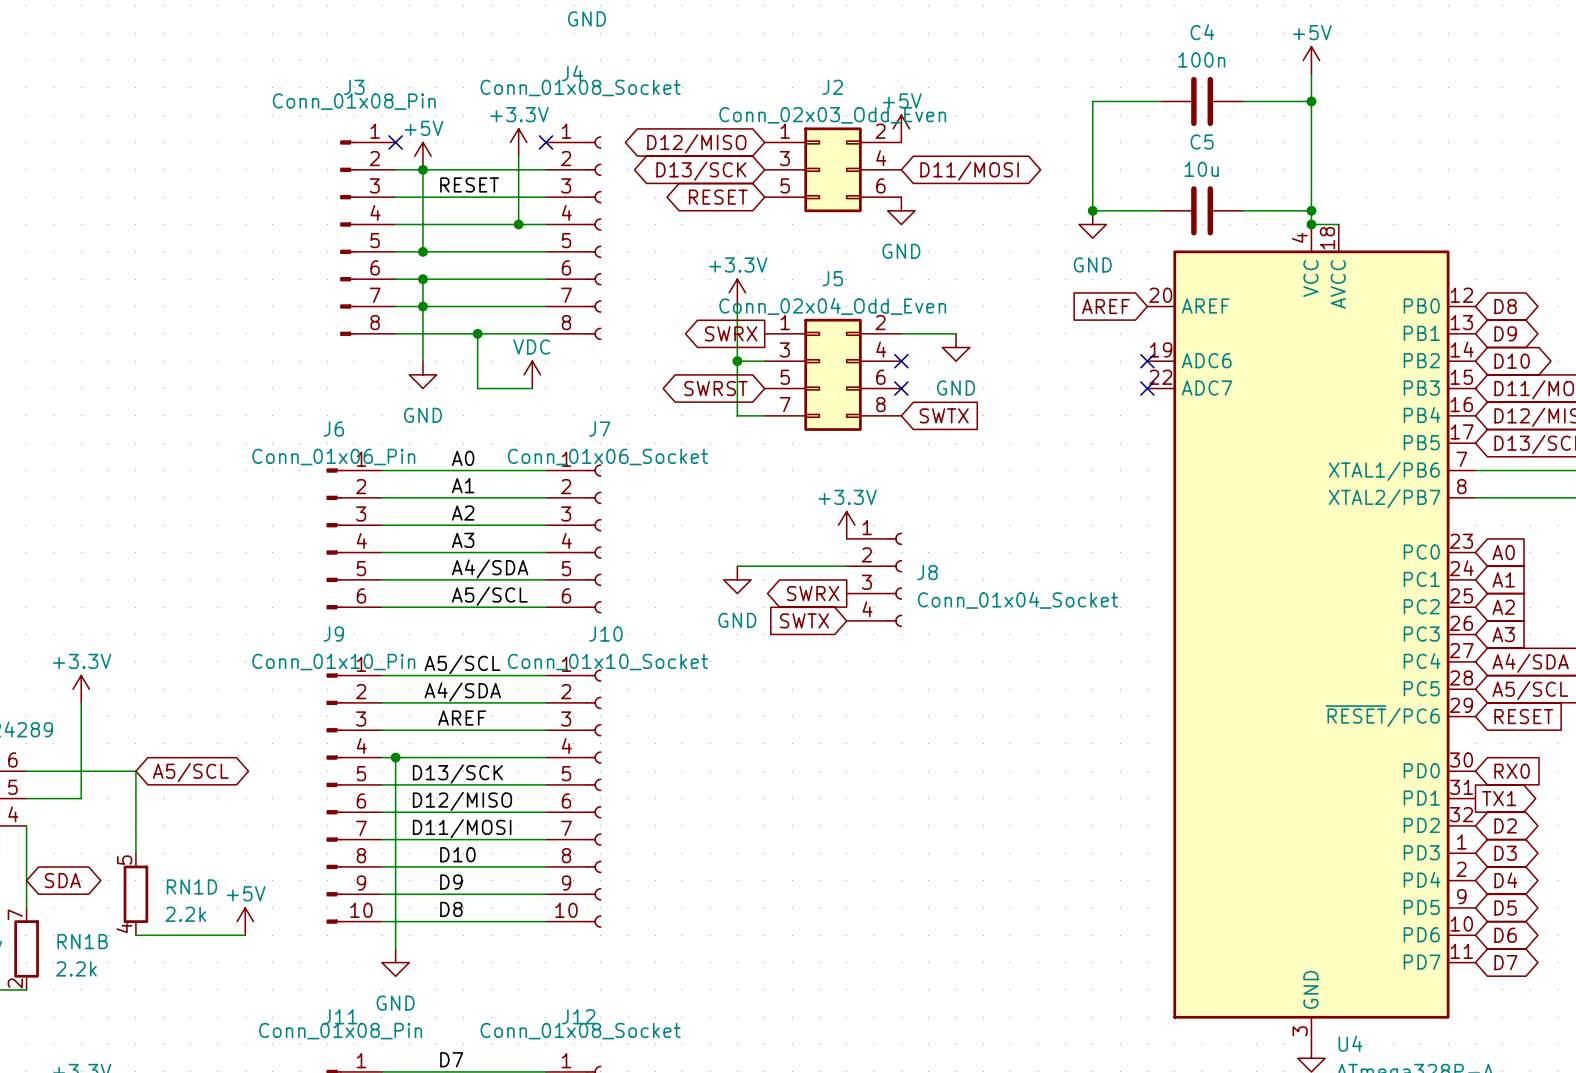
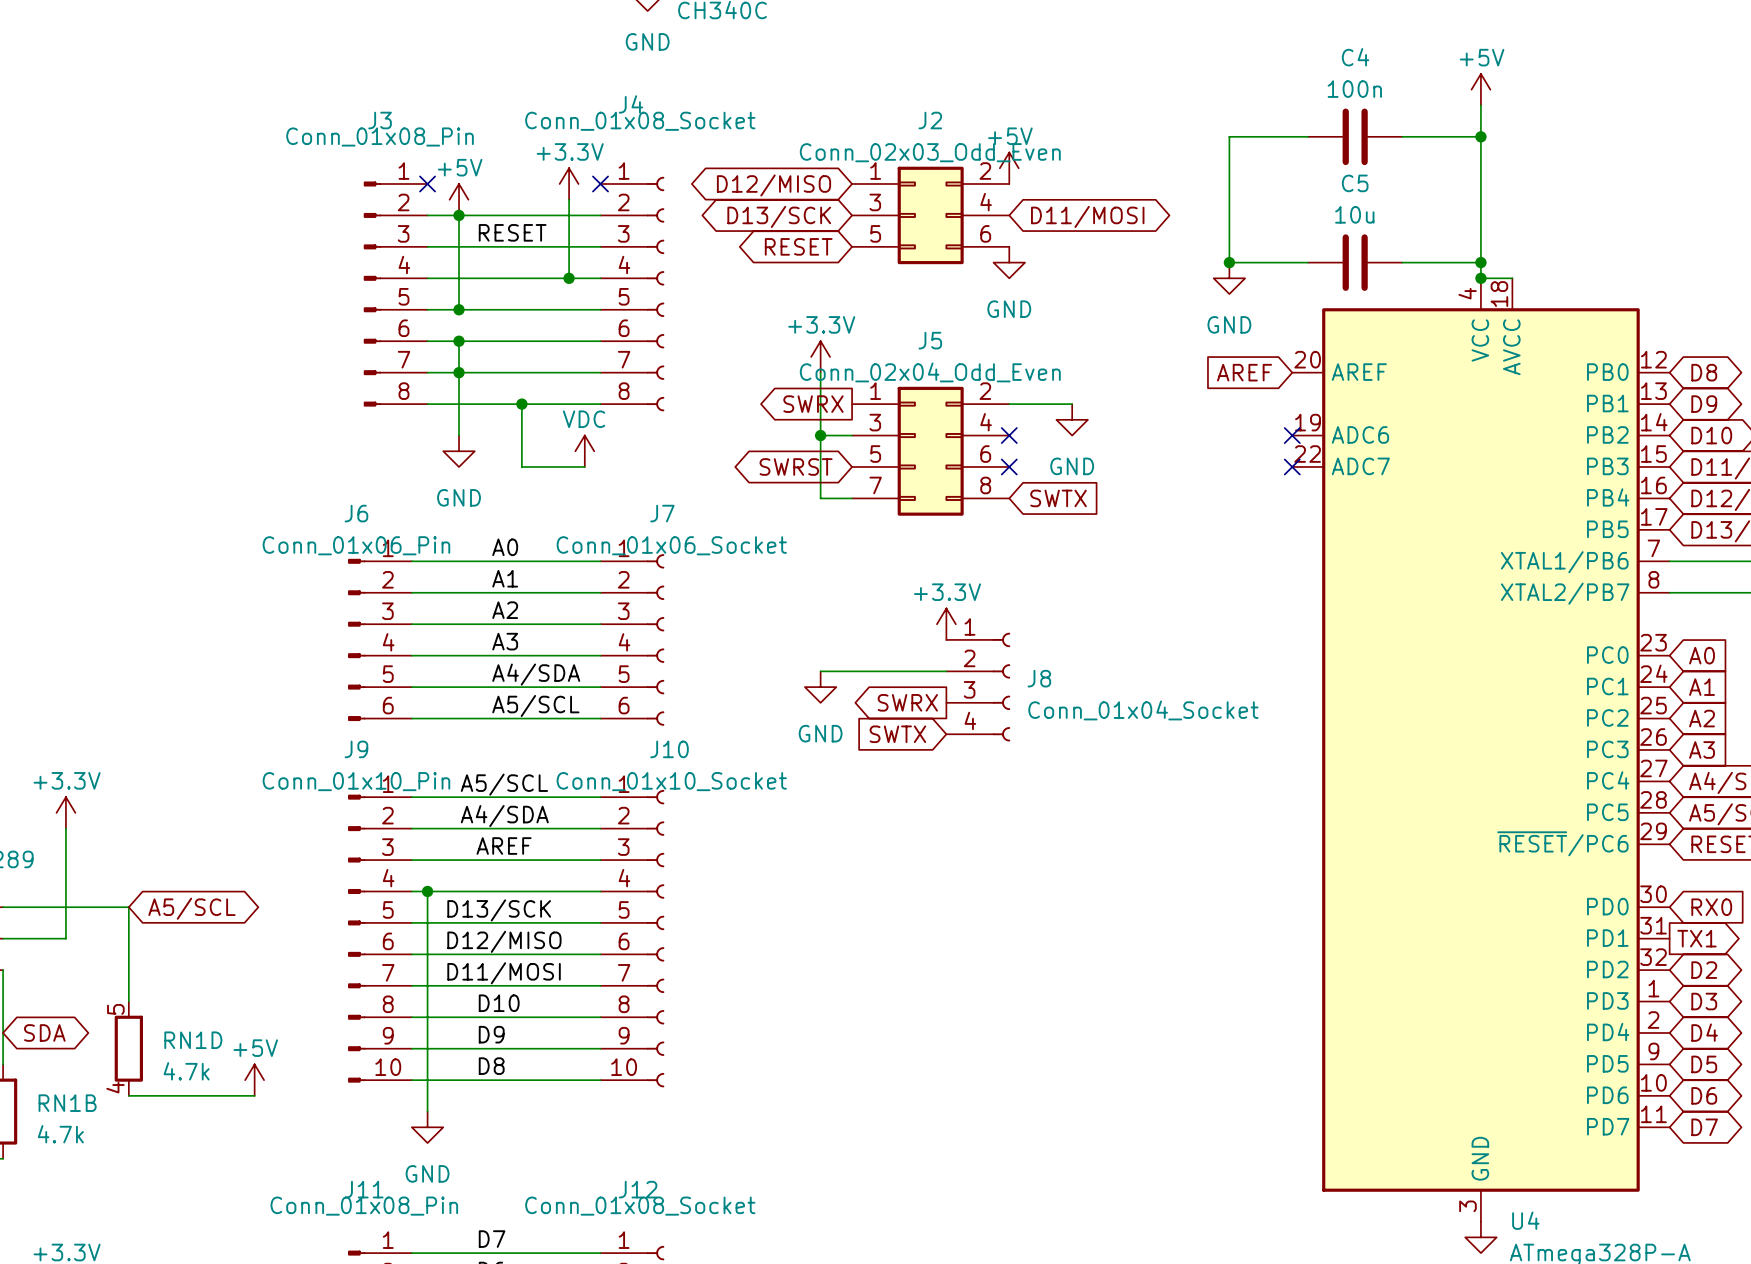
RN1D value: 2.2k (185, 914) -> 4.7k (186, 1071)
RN1B value: 2.2k (76, 968) -> 4.7k (60, 1134)

